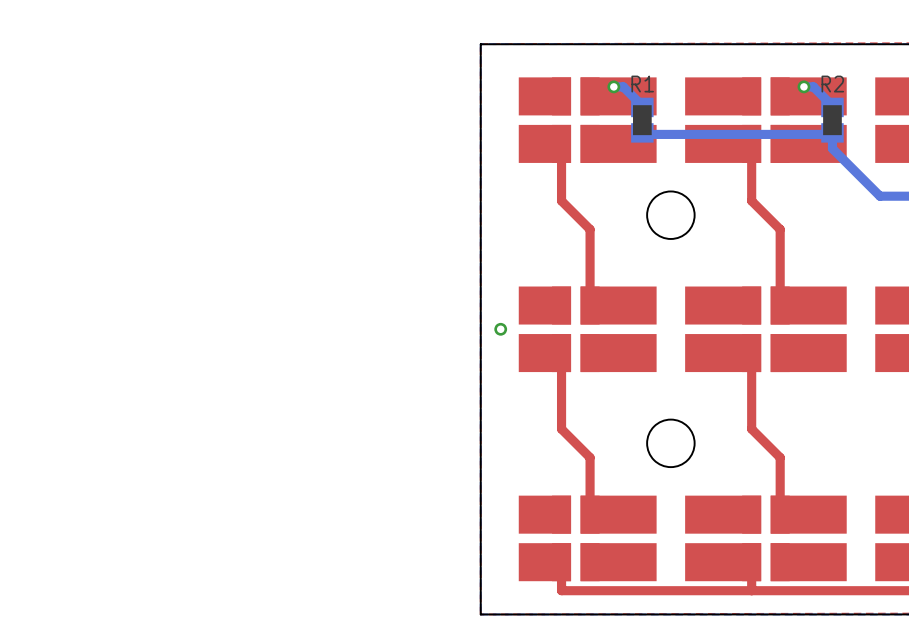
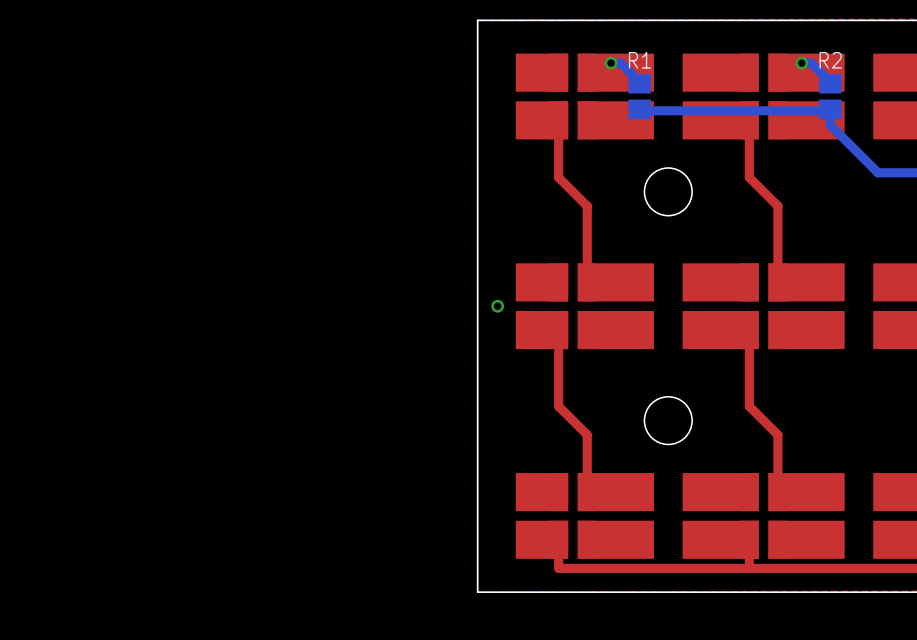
part footprint: [631, 97, 654, 143] -> [628, 74, 651, 120]
part footprint: [821, 97, 844, 143] -> [819, 74, 842, 120]

